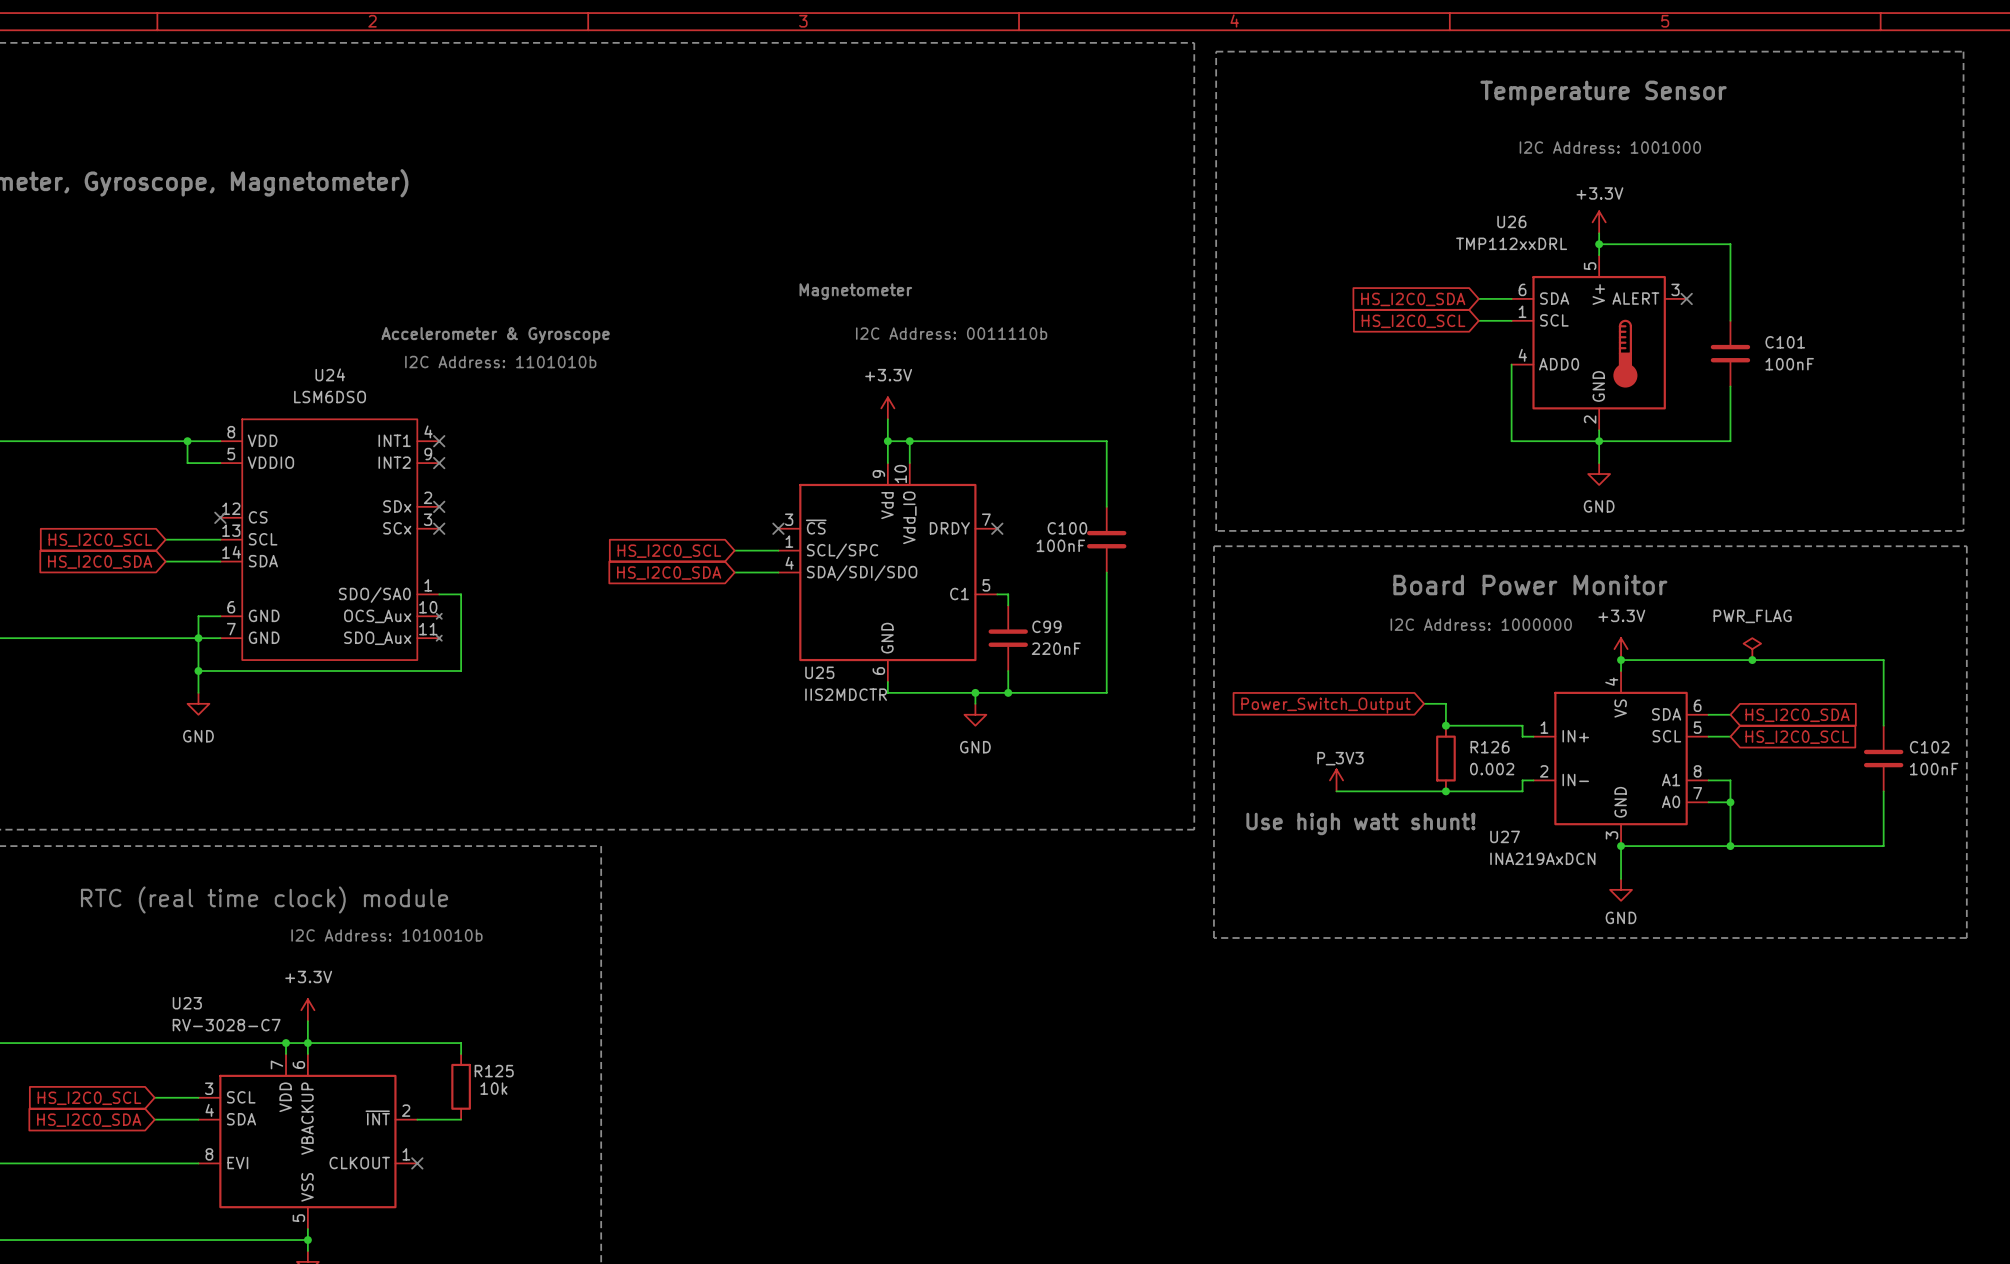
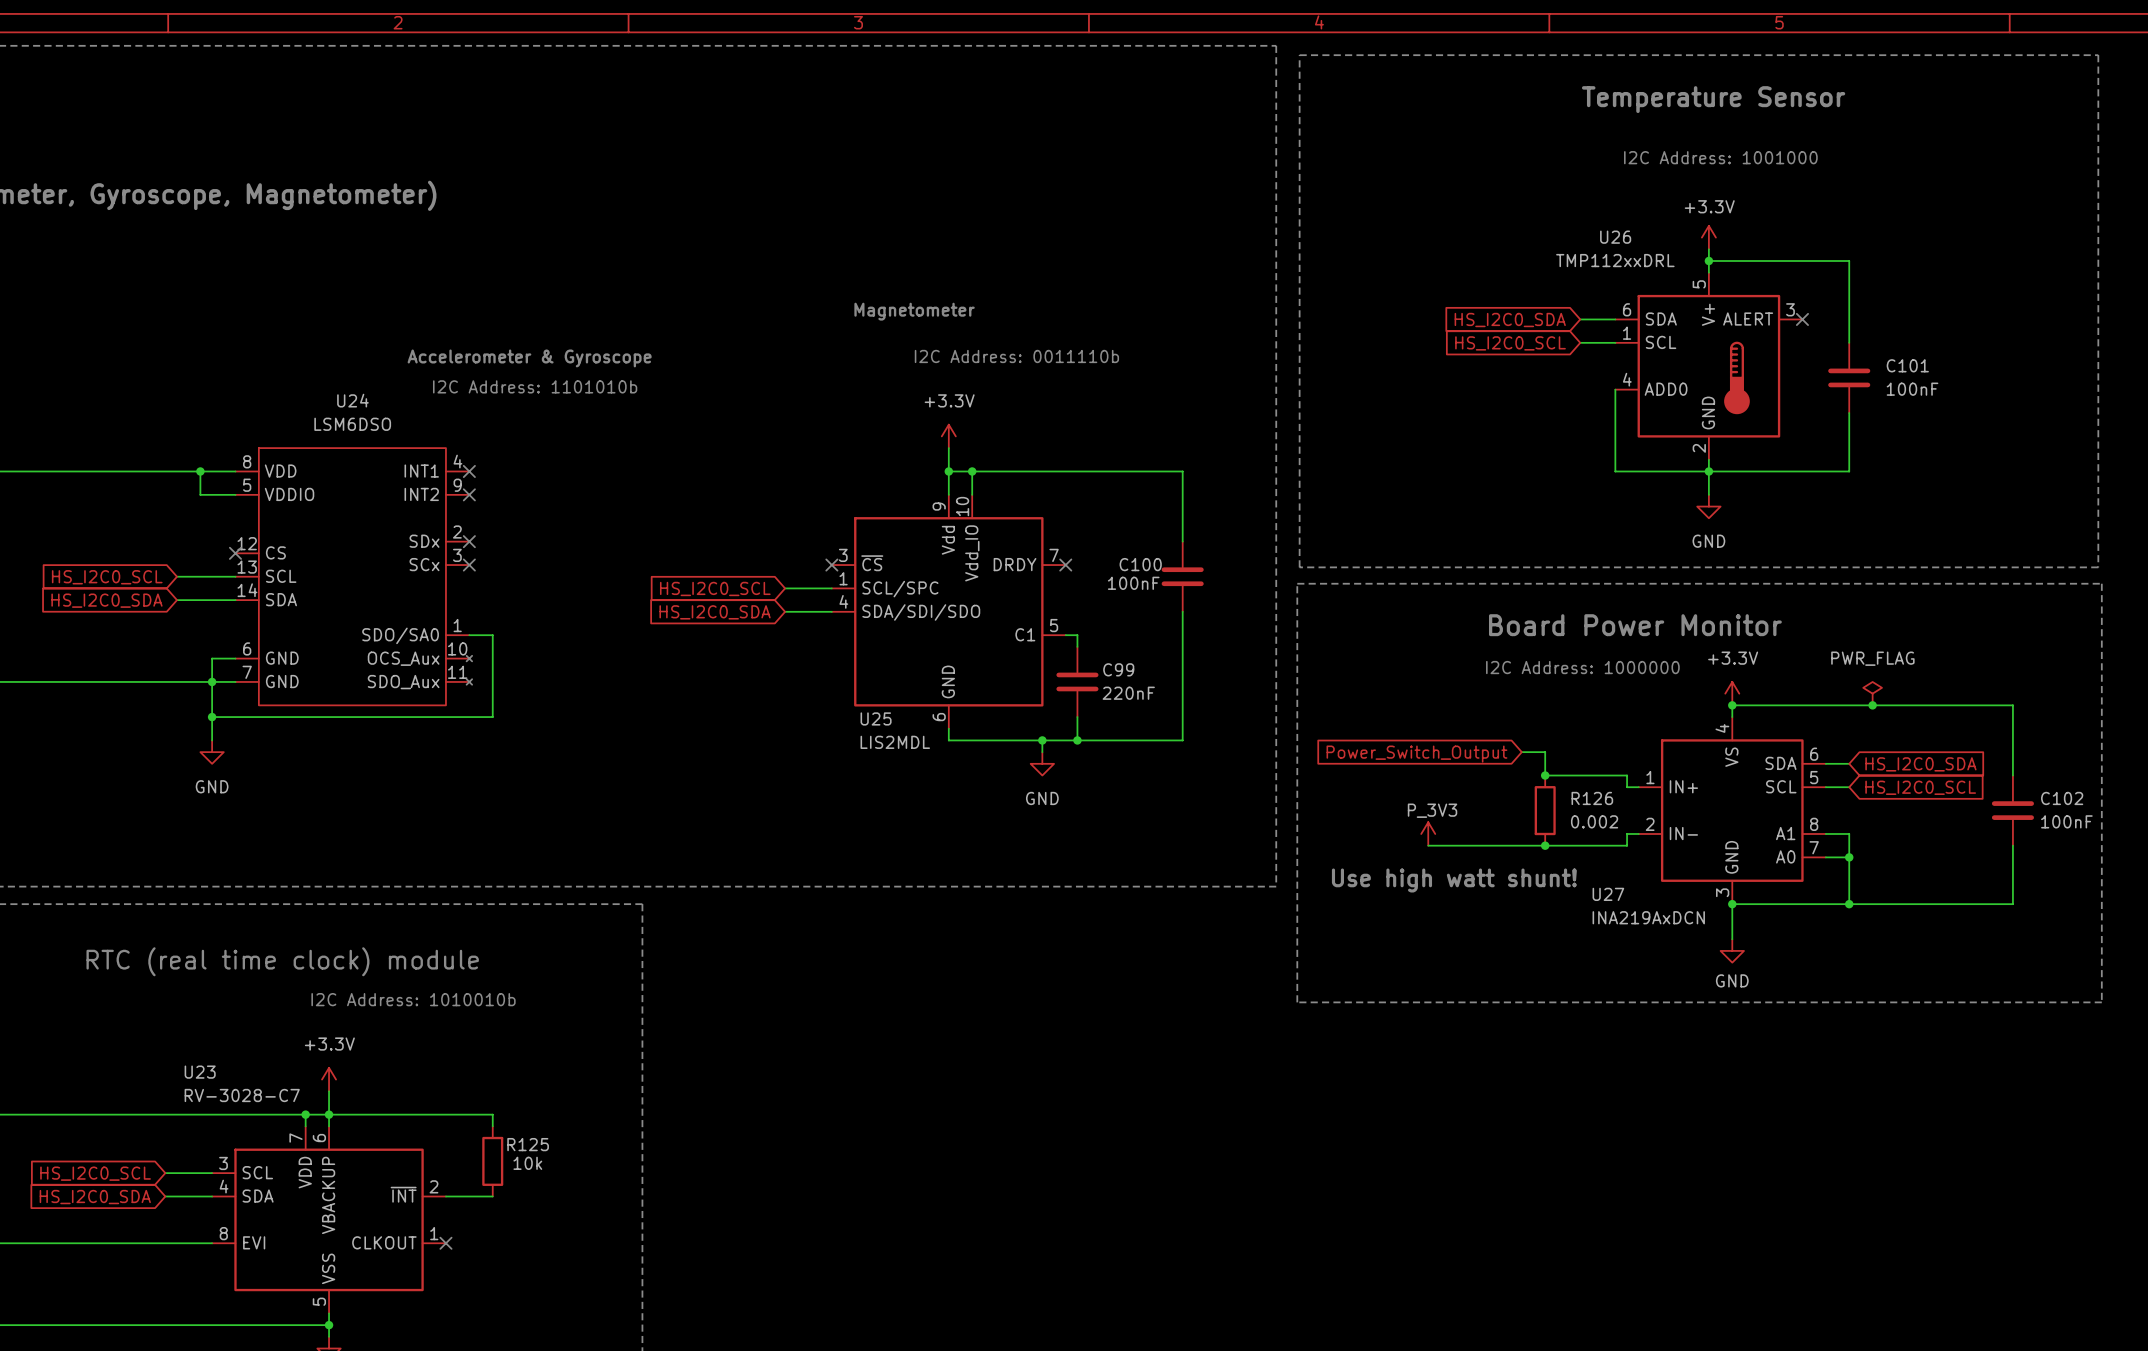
U25 value: IIS2MDCTR (846, 694) -> LIS2MDL (895, 742)

